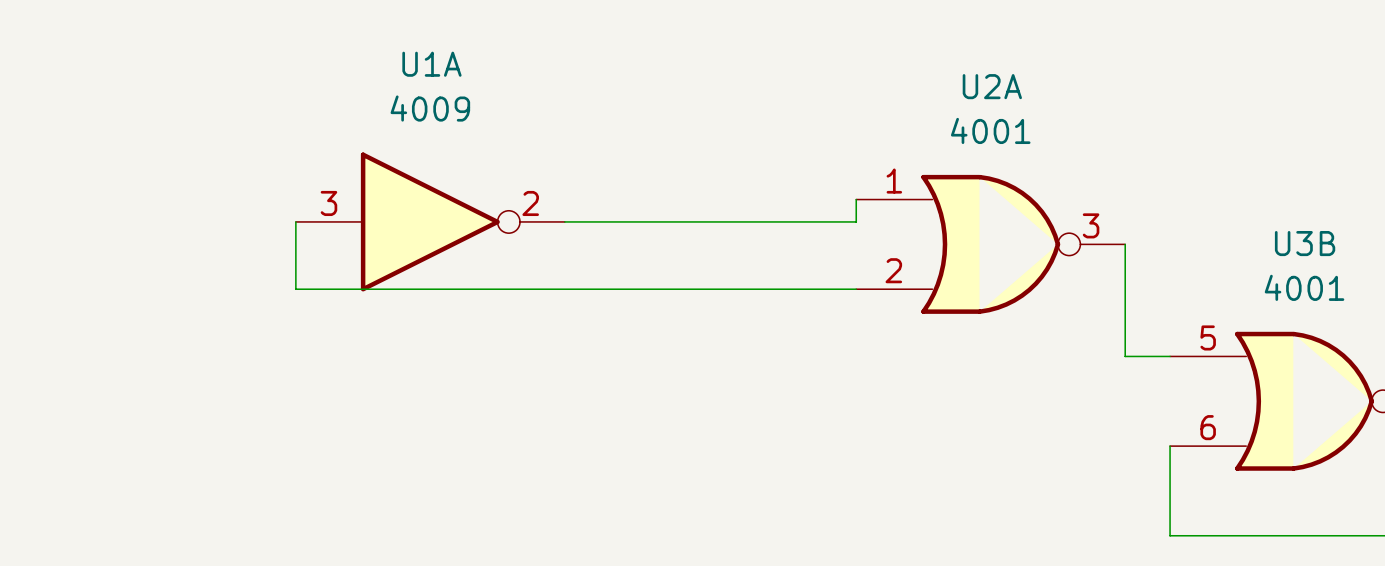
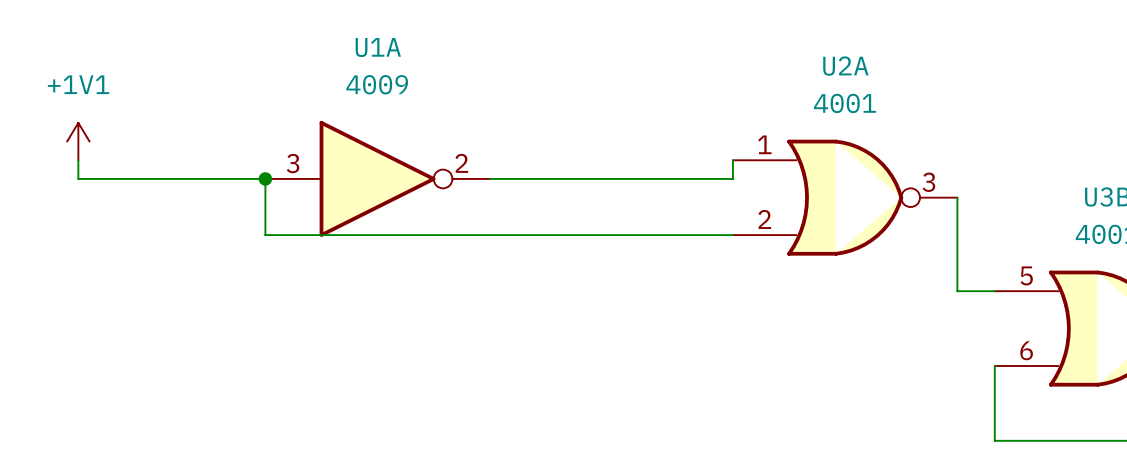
power symbol: none -> +1V1 (78, 141)
wire: none -> (78, 160) (78, 178) (265, 178)
junction: none -> (265, 178)

